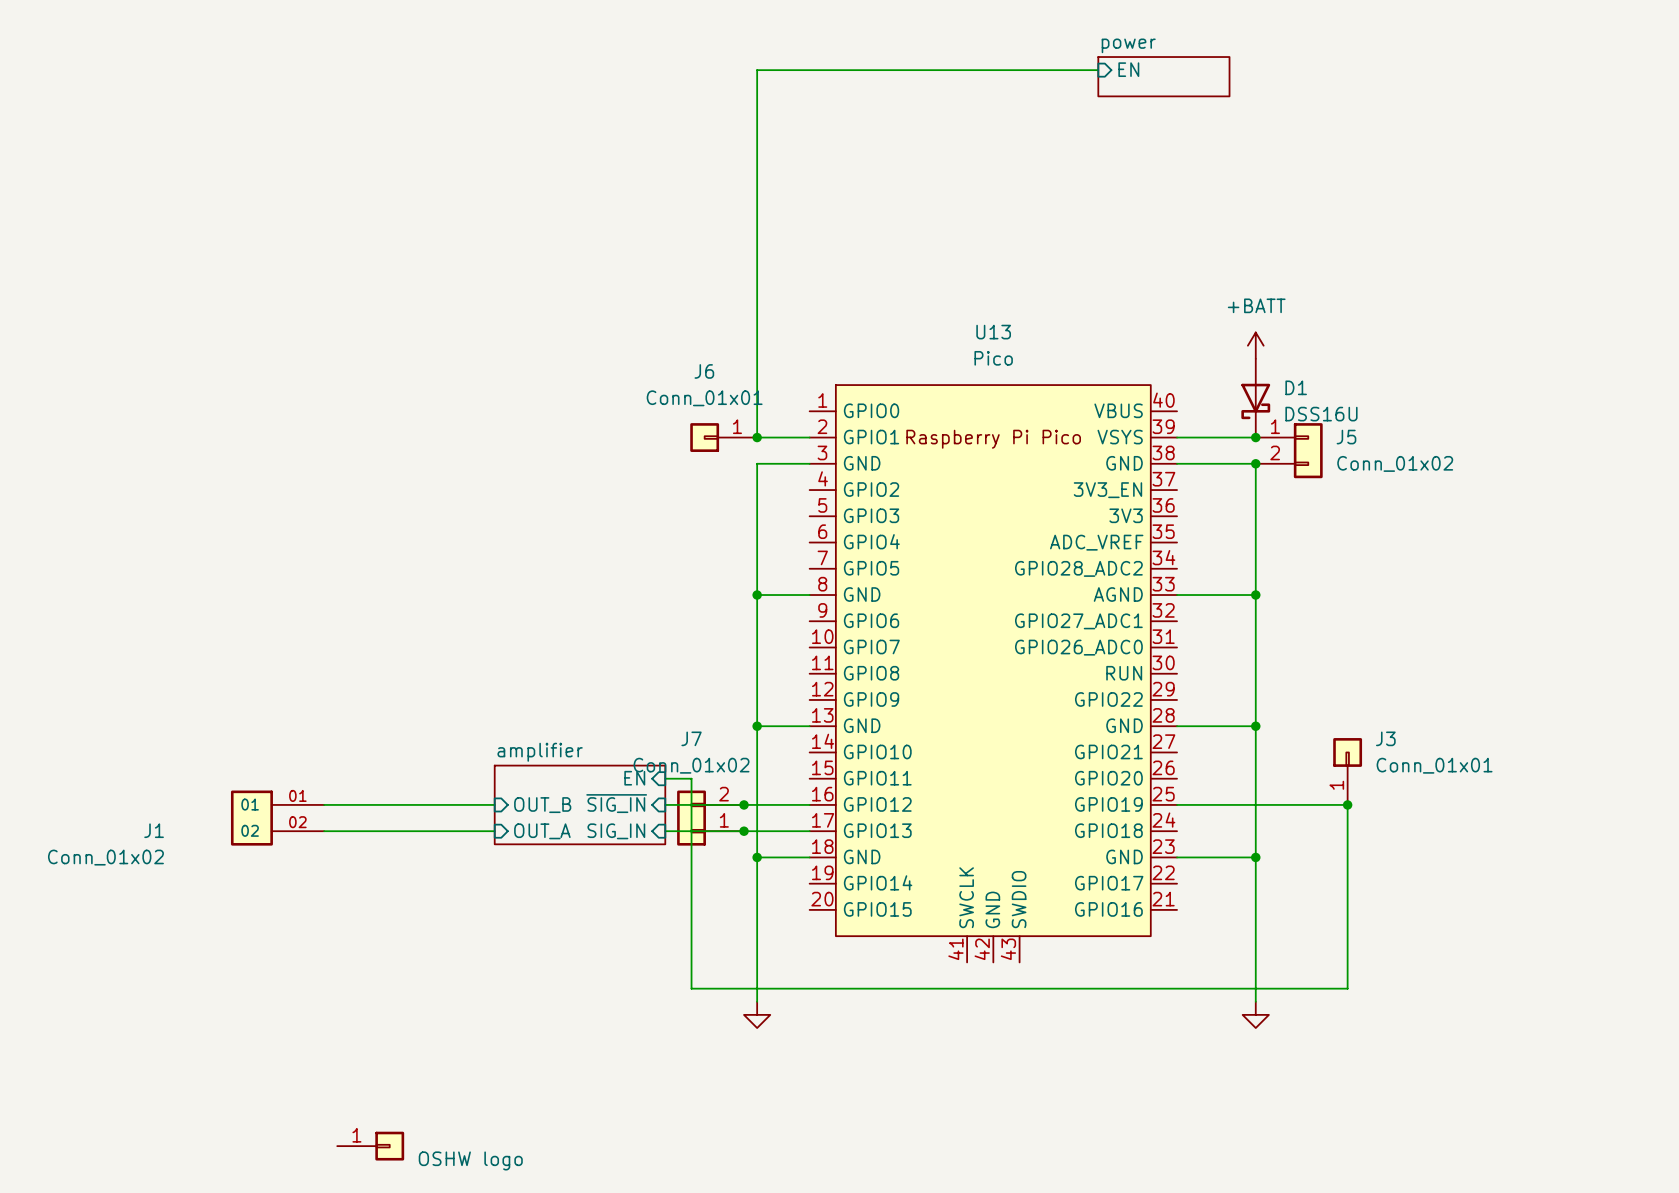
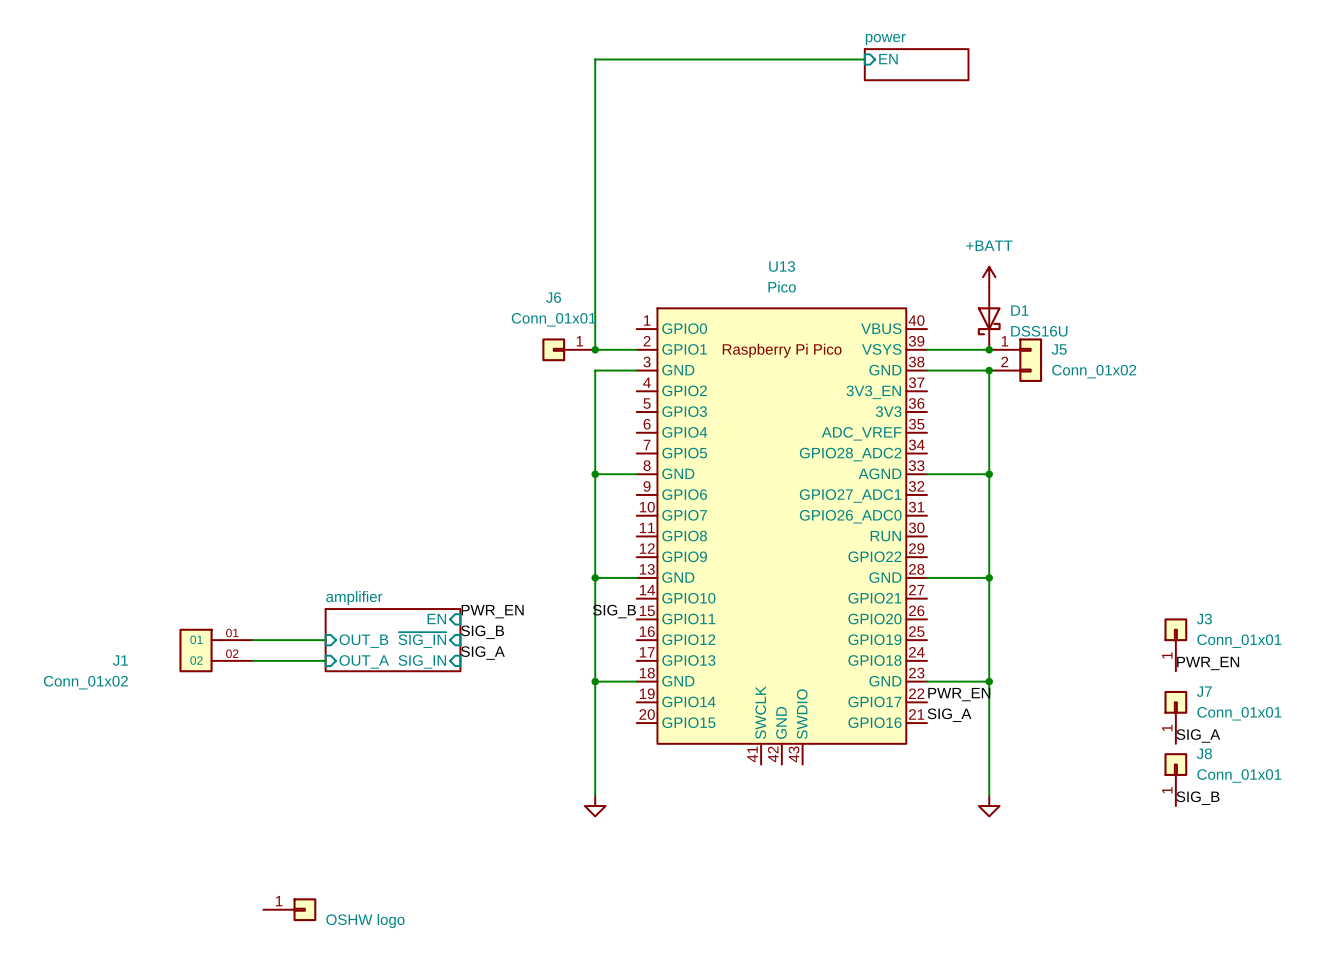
J7 name position: J7 (691, 738) -> J7 (1204, 691)
J7 value: Conn_01x02 (691, 765) -> Conn_01x01 (1239, 713)
label: none -> PWR_EN (492, 611)
label: none -> SIG_B (614, 611)
J3 position: (1347, 771) -> (1175, 644)
sheet pin position: EN (634, 778) -> EN (436, 619)
wire: (665, 778) (691, 778) (691, 988) (1347, 988) (1347, 804) (1177, 804) -> none
J7 symbol: [677, 790, 745, 846] -> [1164, 690, 1188, 744]
label: none -> SIG_B (482, 632)
sheet pin position: ~{SIG_IN} (616, 803) -> ~{SIG_IN} (422, 640)
wire: (415, 804) (494, 804) -> none
sheet amplifier position: (580, 804) -> (393, 640)
wire: (665, 804) (809, 804) -> none
junction: (744, 804) -> none
junction: (1347, 804) -> none
sheet pin position: OUT_B (542, 805) -> OUT_B (363, 641)
label: none -> SIG_A (482, 653)
wire: (415, 831) (494, 831) -> none
sheet pin position: OUT_A (542, 831) -> OUT_A (364, 661)
sheet pin position: SIG_IN (616, 831) -> SIG_IN (422, 661)
wire: (665, 831) (809, 831) -> none
junction: (744, 831) -> none
label: none -> PWR_EN (1208, 663)
label: none -> PWR_EN (959, 694)
label: none -> SIG_A (949, 715)
label: none -> SIG_A (1198, 735)
J8: none -> Conn_01x01 (1175, 779)
label: none -> SIG_B (1198, 798)

